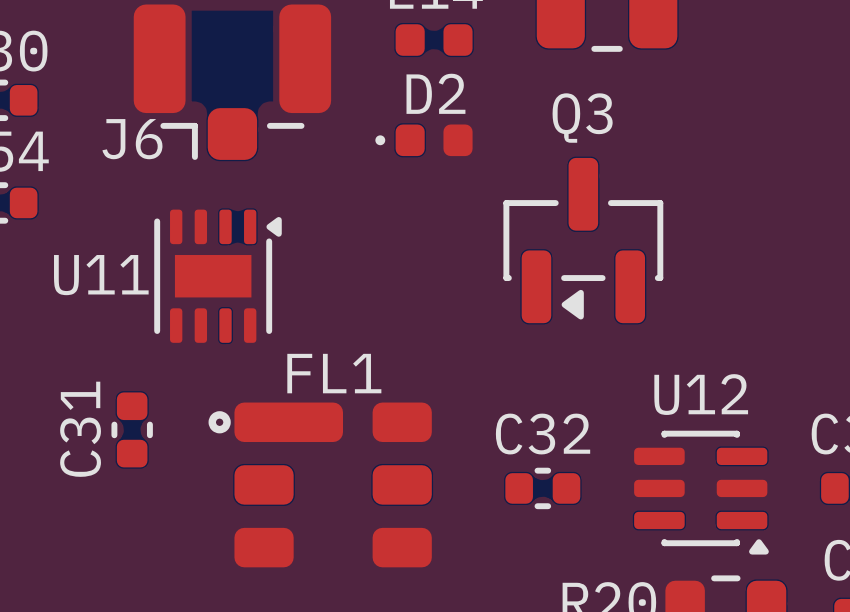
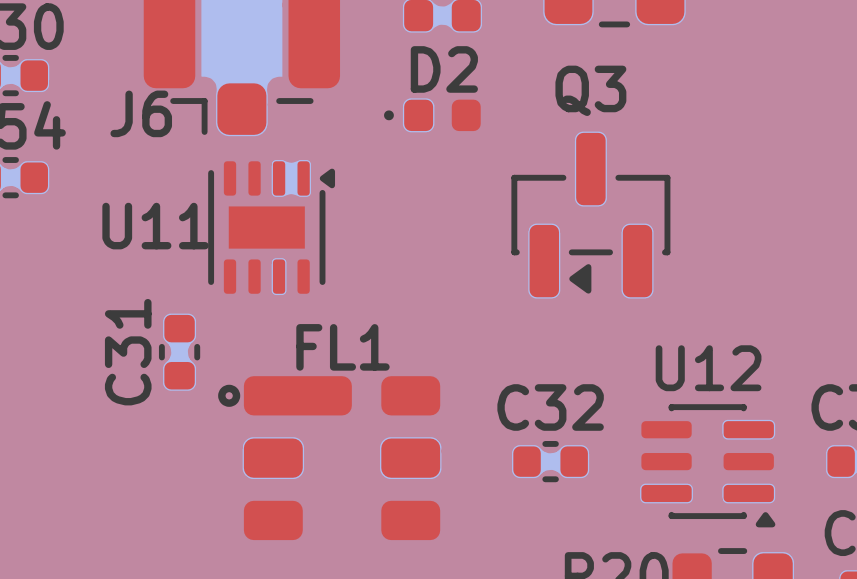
U11 position: (217, 276) -> (271, 227)
C31 position: (132, 429) -> (179, 352)

